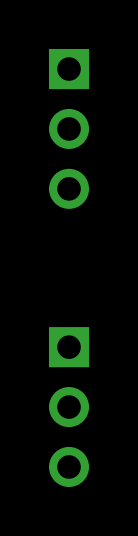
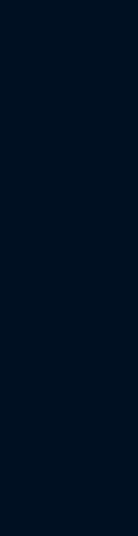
part: (69, 128) -> none
part: (69, 407) -> none

